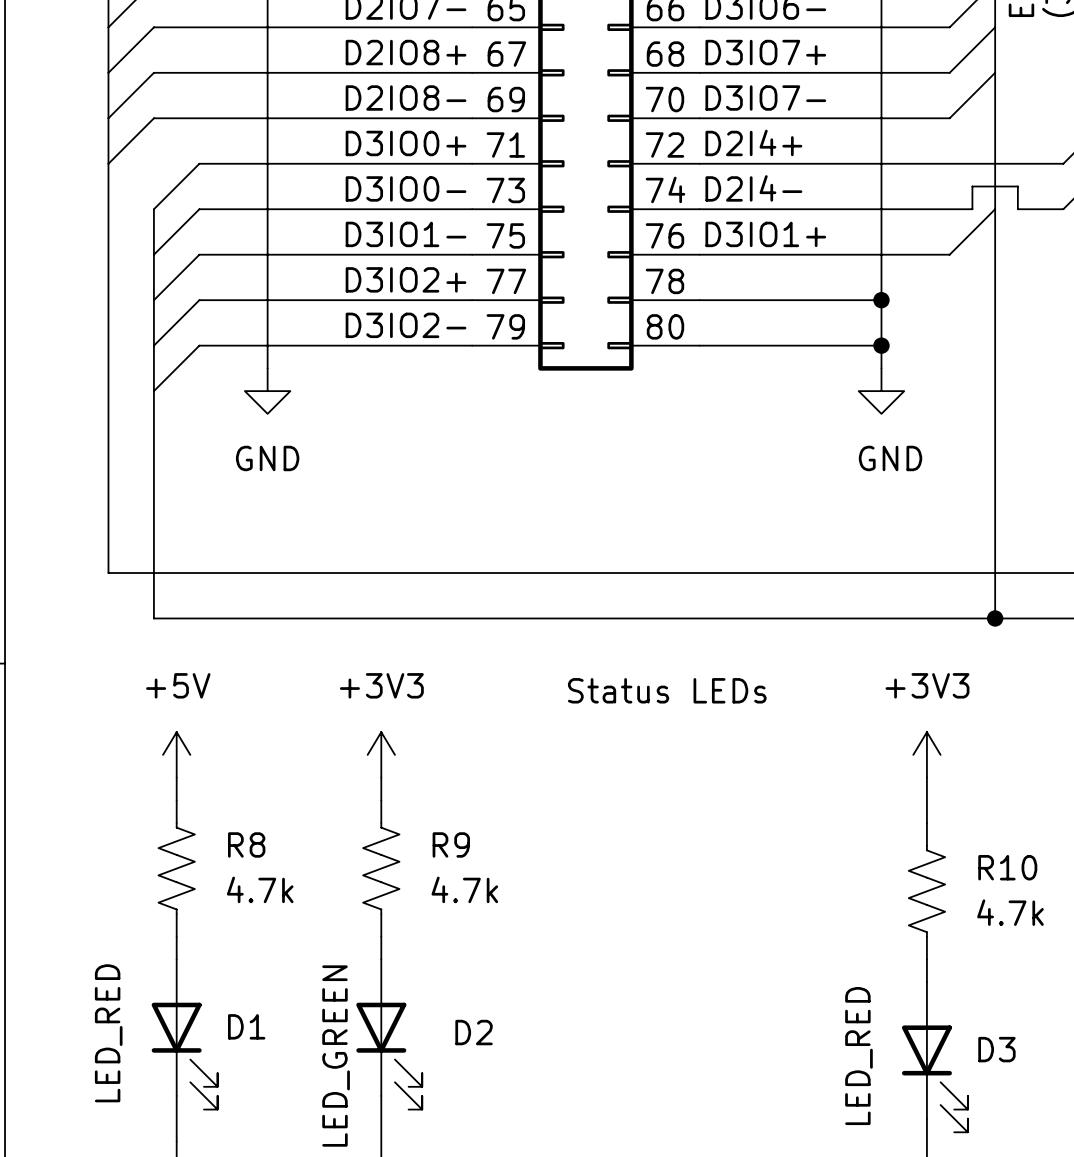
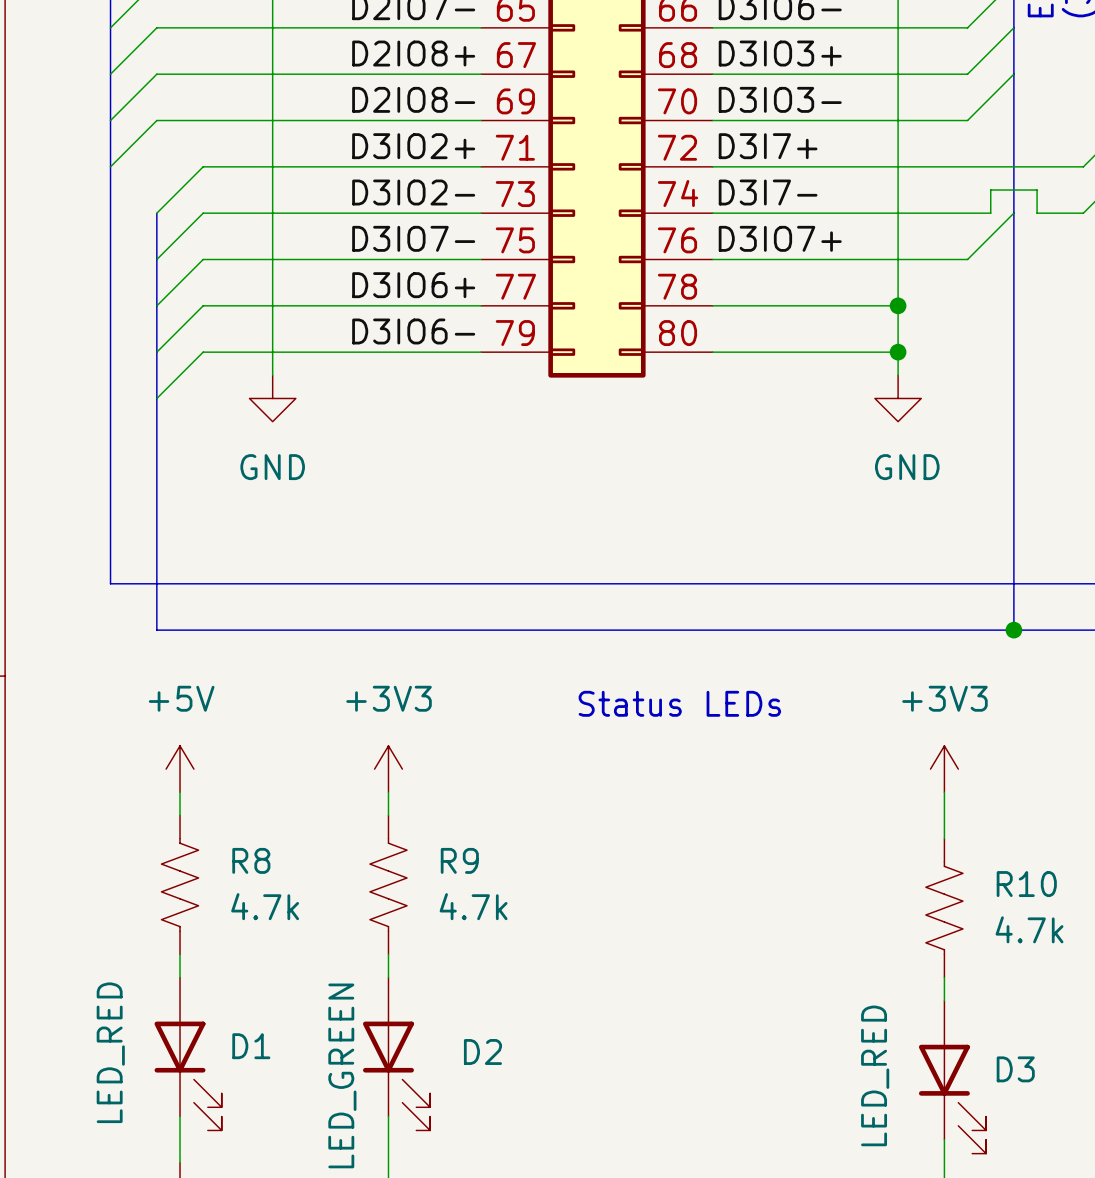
label: D3IO7+ (765, 52) -> D3IO3+ (780, 53)
label: D3IO7- (765, 98) -> D3IO3- (780, 99)
label: D2I4+ (753, 142) -> D3I7+ (768, 146)
label: D3IO0+ (406, 143) -> D3IO2+ (413, 146)
label: D3IO0- (406, 188) -> D3IO2- (413, 192)
label: D2I4- (753, 188) -> D3I7- (768, 192)
label: D3IO1- (406, 234) -> D3IO7- (413, 238)
label: D3IO1+ (765, 234) -> D3IO7+ (780, 238)
label: D3IO2+ (406, 279) -> D3IO6+ (413, 285)
label: D3IO2- (406, 325) -> D3IO6- (413, 331)

